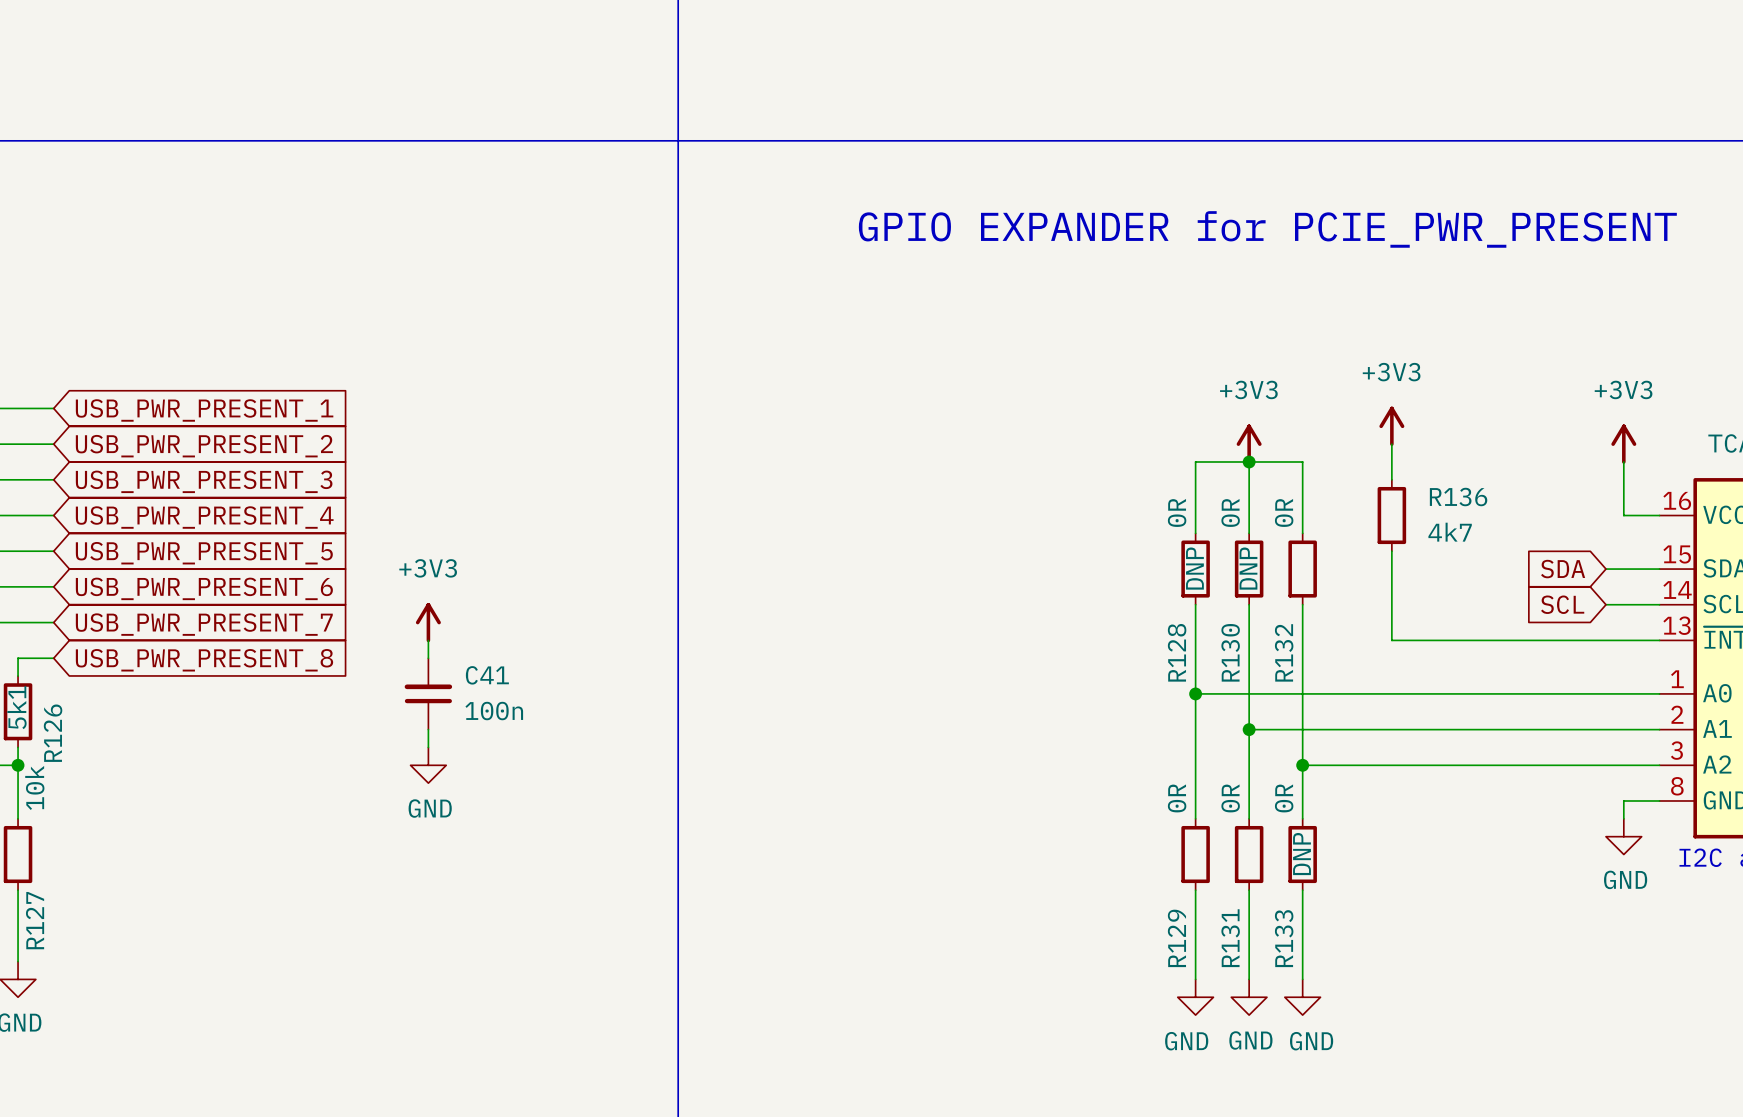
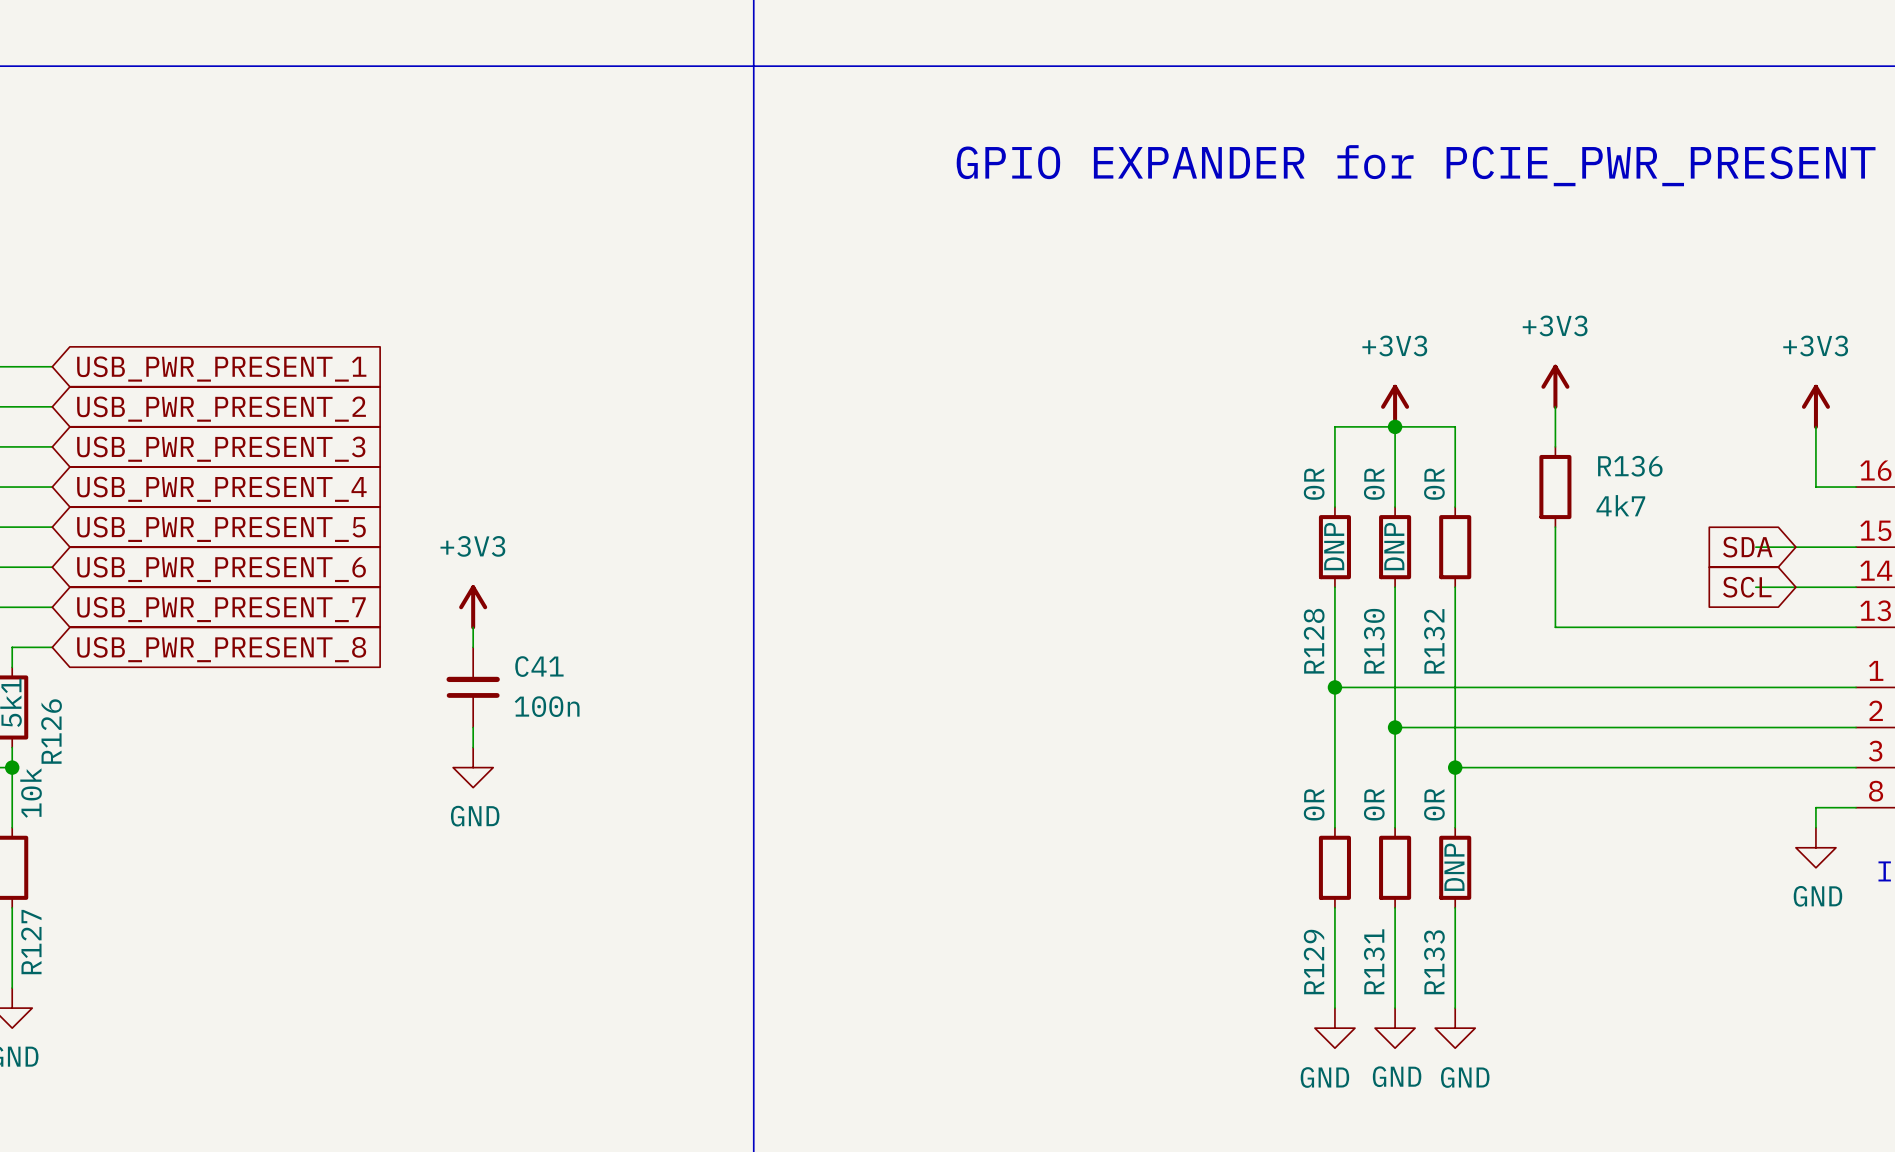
wire: none -> (1755, 547) (1795, 547)
wire: none -> (1755, 587) (1795, 587)

